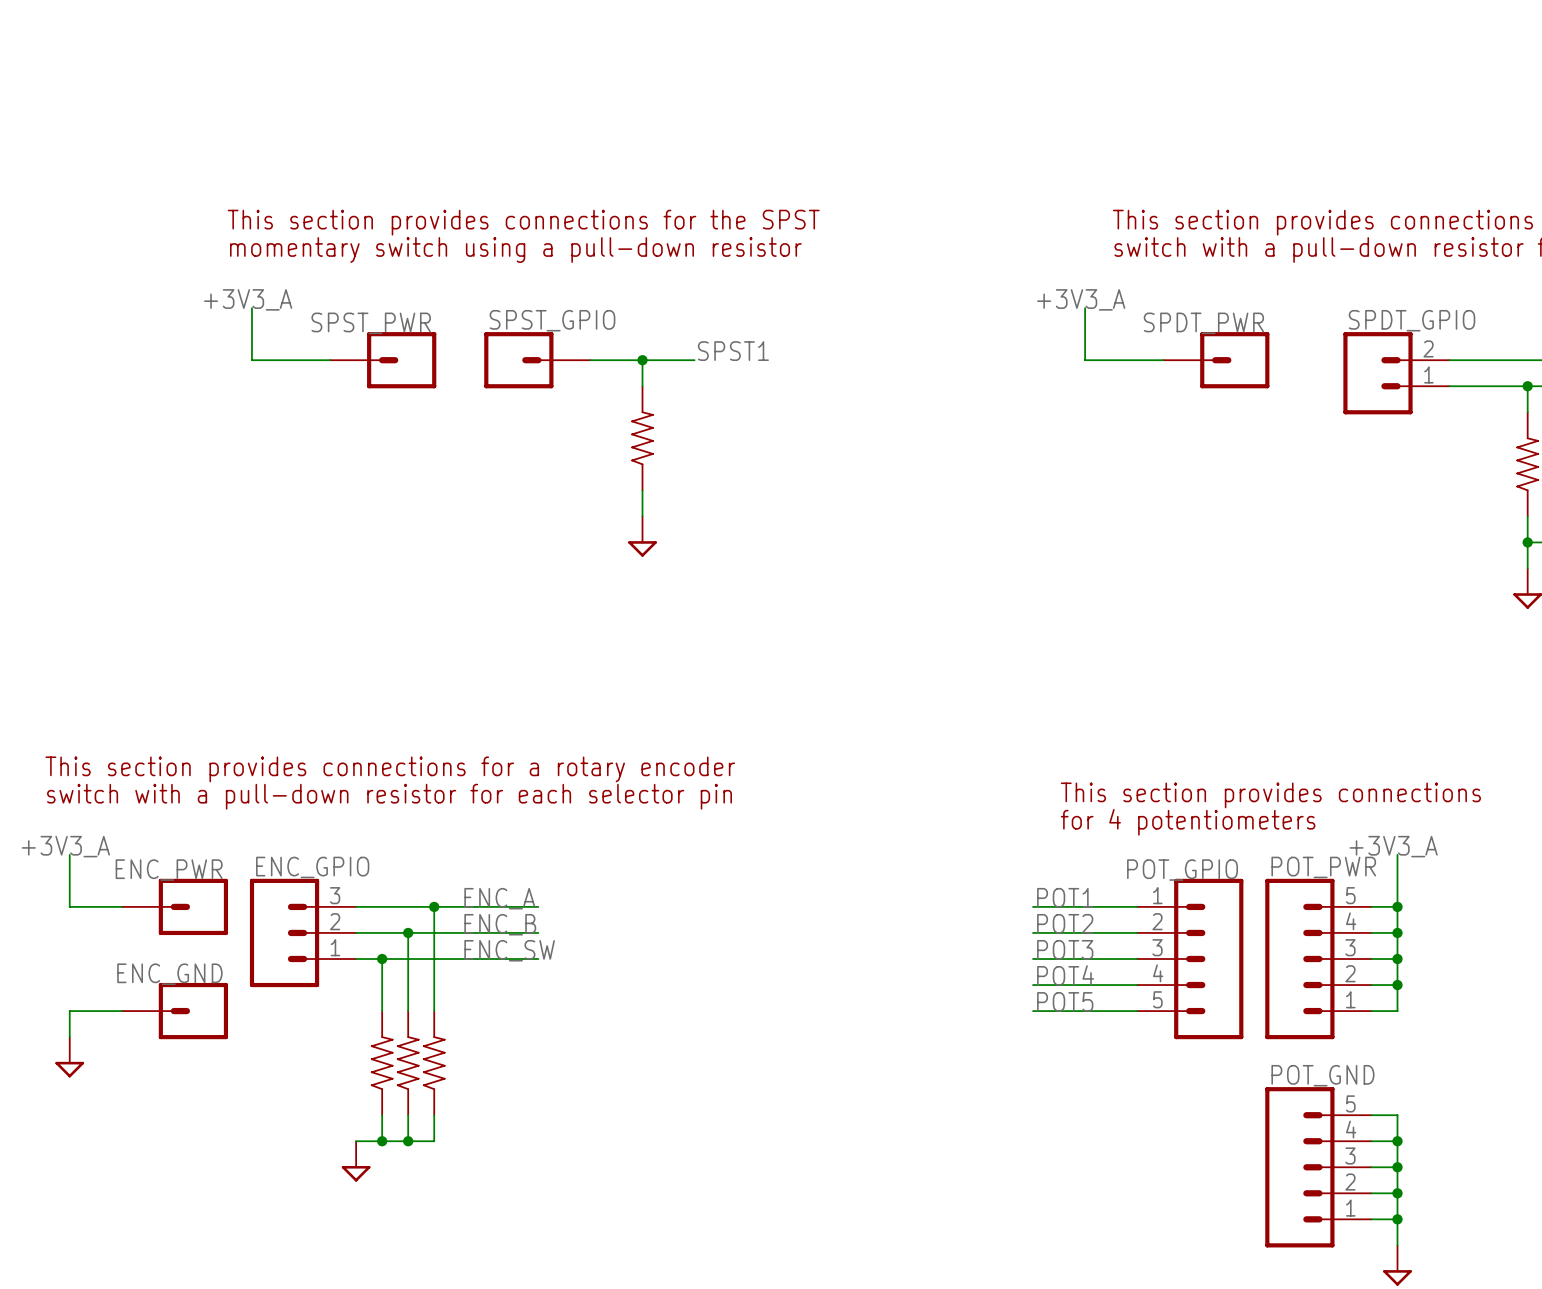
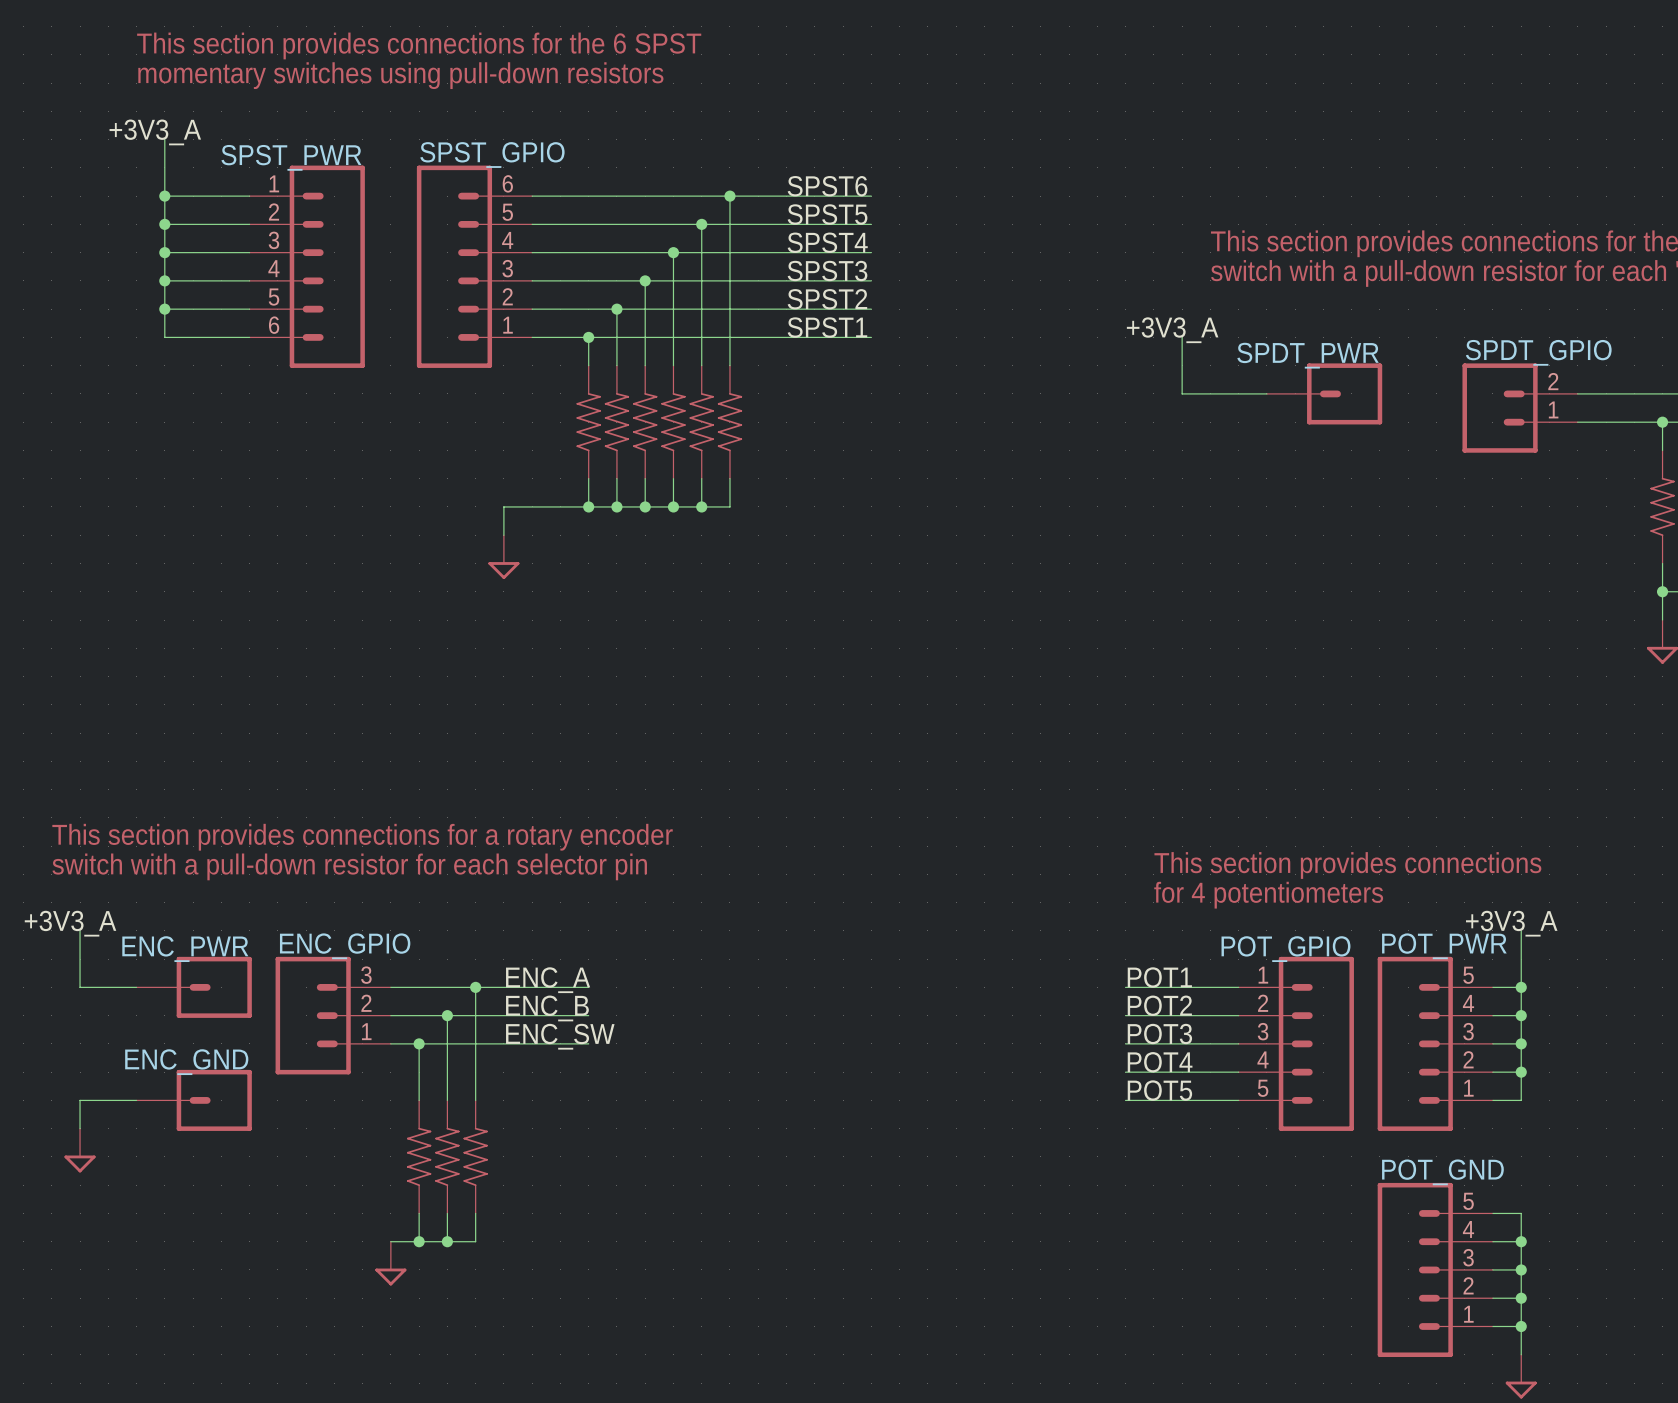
text: none -> This section provides connections for the 6 SPST (419, 45)
text: none -> momentary switches using pull-down resistors (400, 75)
wire: none -> (164, 139) (164, 337) (249, 337)
label: none -> SPST6 (827, 186)
wire: none -> (164, 196) (249, 196)
junction: none -> (164, 196)
wire: none -> (532, 196) (871, 196)
wire: none -> (729, 196) (729, 365)
junction: none -> (729, 196)
label: none -> SPST5 (827, 214)
wire: none -> (164, 224) (249, 224)
junction: none -> (164, 224)
wire: none -> (532, 224) (871, 224)
wire: none -> (701, 224) (701, 365)
junction: none -> (701, 224)
label: none -> SPST4 (827, 242)
text: This section provides connections for the SPST (523, 222) -> none
wire: none -> (164, 252) (249, 252)
junction: none -> (164, 252)
wire: none -> (532, 252) (871, 252)
wire: none -> (673, 252) (673, 365)
junction: none -> (673, 252)
SPST_PWR: none -> (307, 266)
SPST_GPIO: none -> (474, 266)
label: none -> SPST3 (827, 270)
text: momentary switch using a pull-down resistor (515, 249) -> none
wire: none -> (164, 280) (249, 280)
junction: none -> (164, 280)
wire: none -> (532, 280) (871, 280)
wire: none -> (645, 280) (645, 365)
junction: none -> (645, 280)
label: none -> SPST2 (827, 299)
wire: none -> (164, 309) (249, 309)
junction: none -> (164, 309)
wire: none -> (532, 309) (871, 309)
wire: none -> (616, 309) (616, 365)
junction: none -> (616, 309)
label position: +3V3_A (248, 299) -> +3V3_A (155, 132)
wire: (251, 308) (251, 360) (330, 360) -> none
wire: none -> (532, 337) (871, 337)
junction: none -> (588, 337)
label position: SPST1 (733, 351) -> SPST1 (827, 327)
SPST_PWR: (383, 360) -> none
SPST_GPIO: (537, 360) -> none
wire: (590, 360) (694, 360) -> none
wire: (642, 360) (642, 386) -> (588, 337) (588, 365)
junction: (642, 360) -> none
part: none -> (588, 422)
part: none -> (616, 422)
part: none -> (645, 422)
part: none -> (673, 422)
part: none -> (701, 422)
part: none -> (729, 422)
wire: none -> (616, 478) (616, 506)
wire: none -> (645, 478) (645, 506)
wire: none -> (673, 478) (673, 506)
wire: none -> (701, 478) (701, 506)
part: (642, 438) -> none
wire: none -> (729, 478) (729, 506) (503, 506) (503, 535)
junction: none -> (588, 506)
junction: none -> (616, 506)
junction: none -> (645, 506)
junction: none -> (673, 506)
junction: none -> (701, 506)
wire: (642, 490) (642, 516) -> (588, 478) (588, 506)
power symbol position: (642, 536) -> (503, 557)

